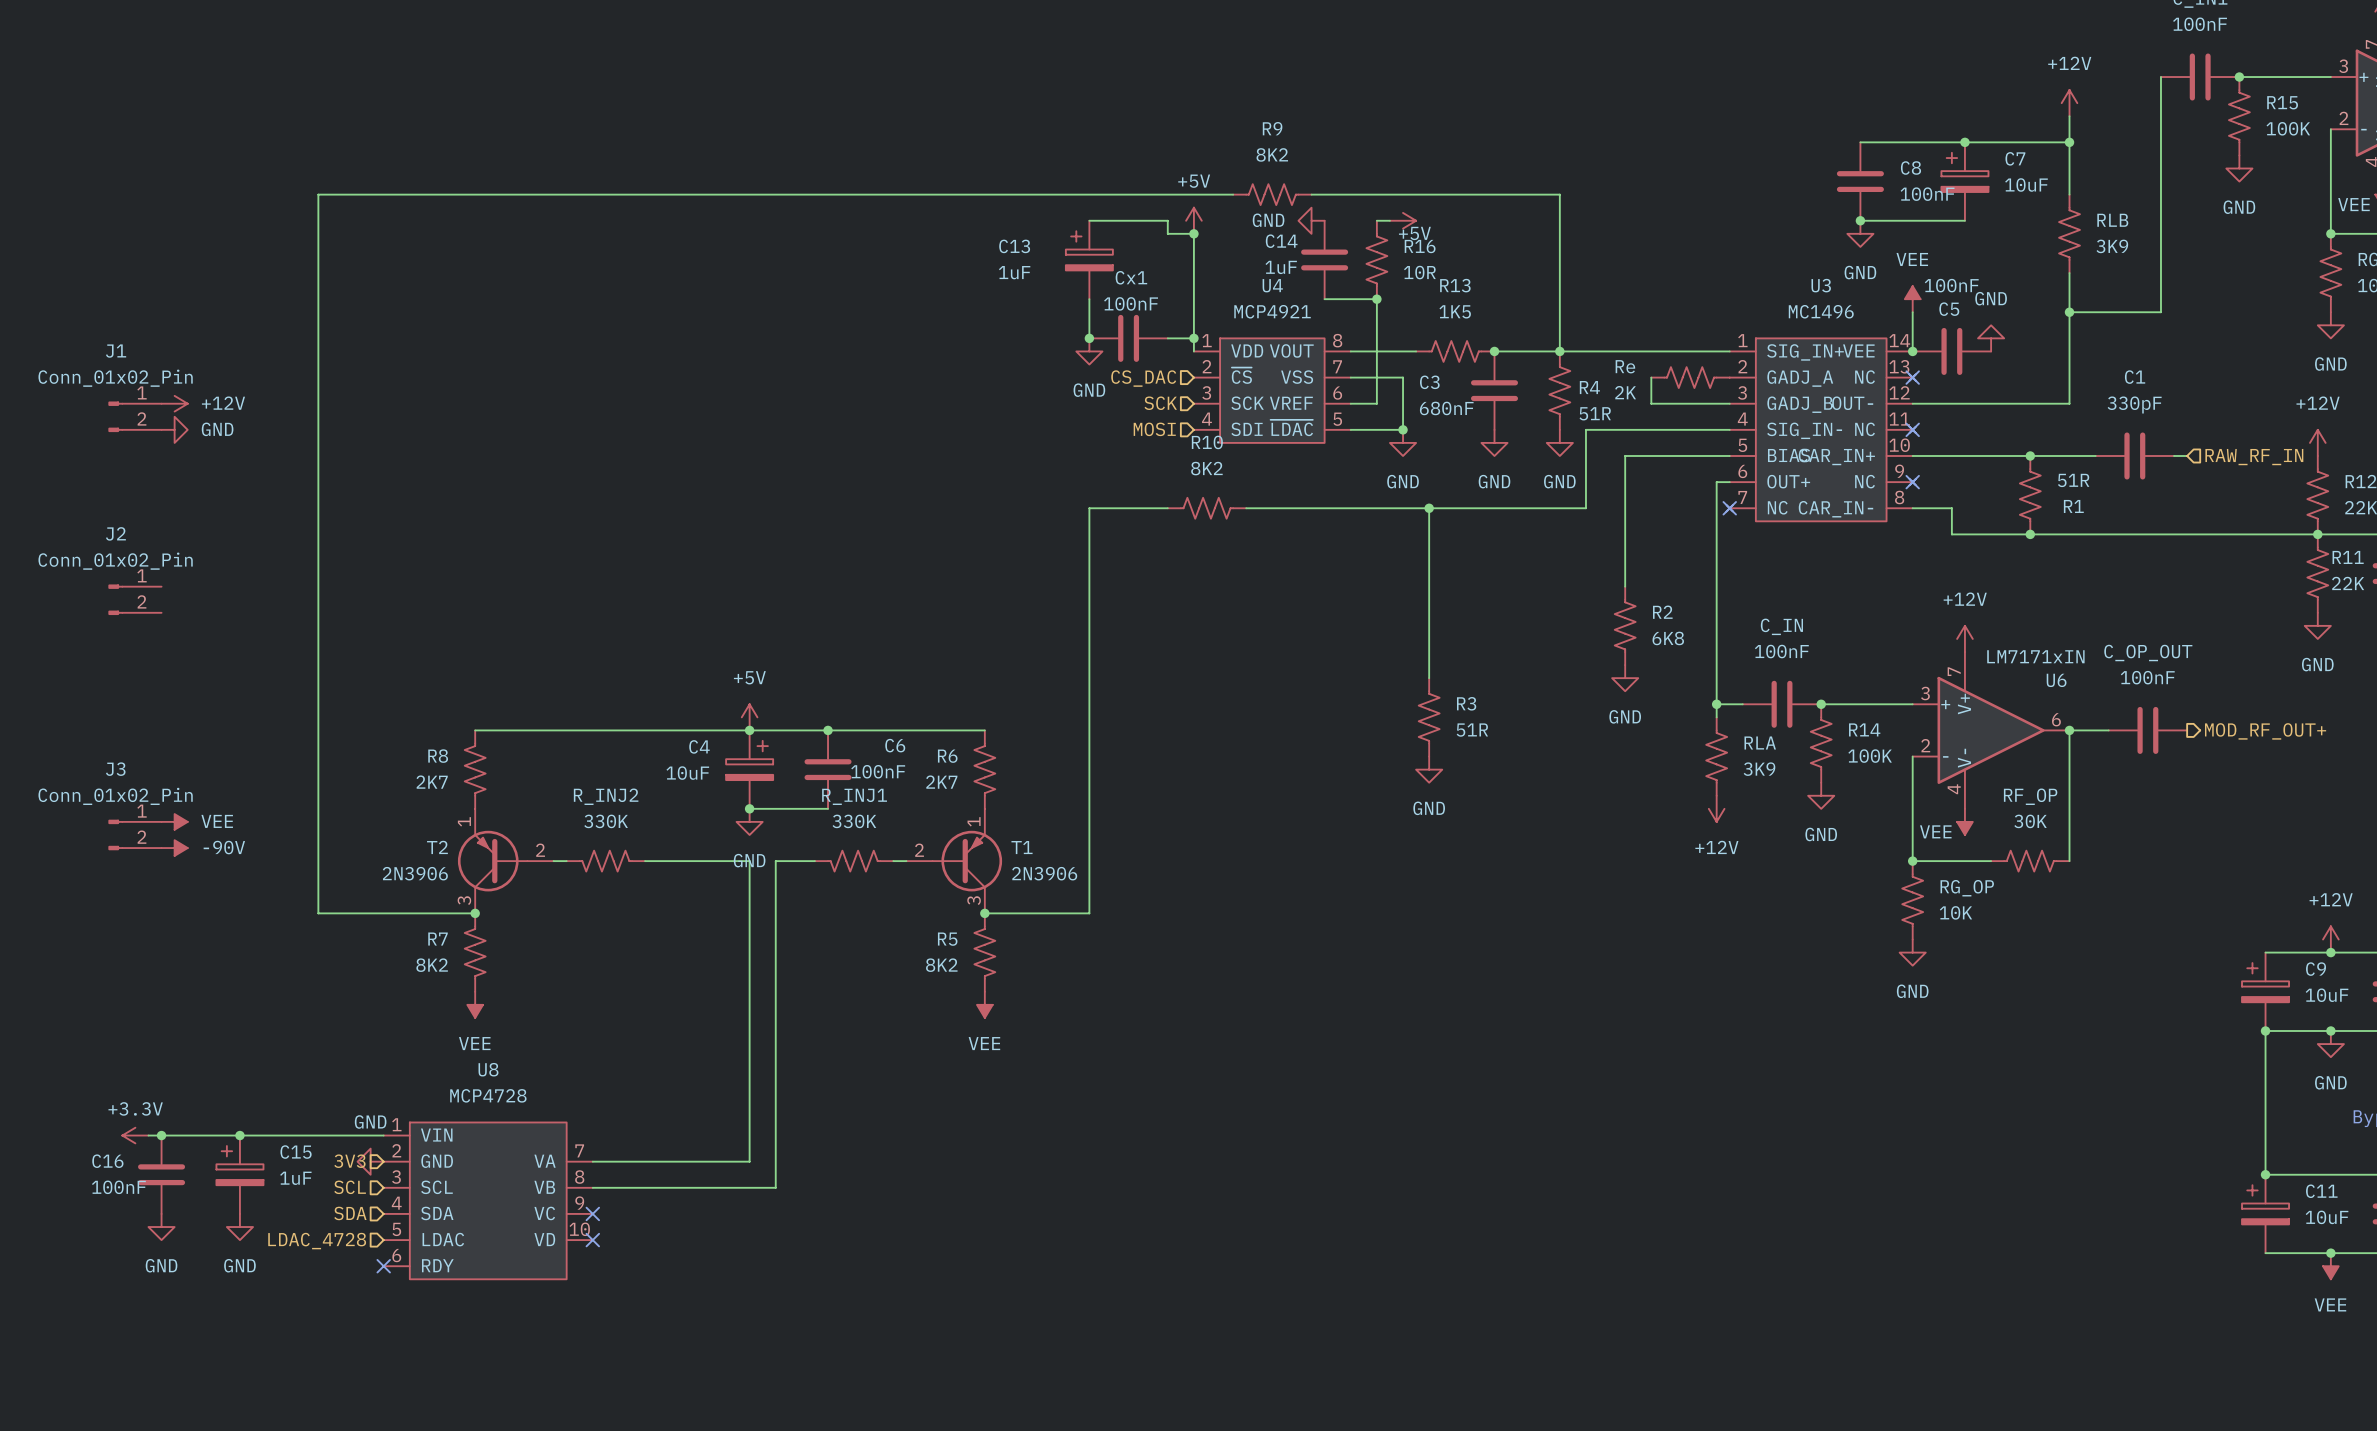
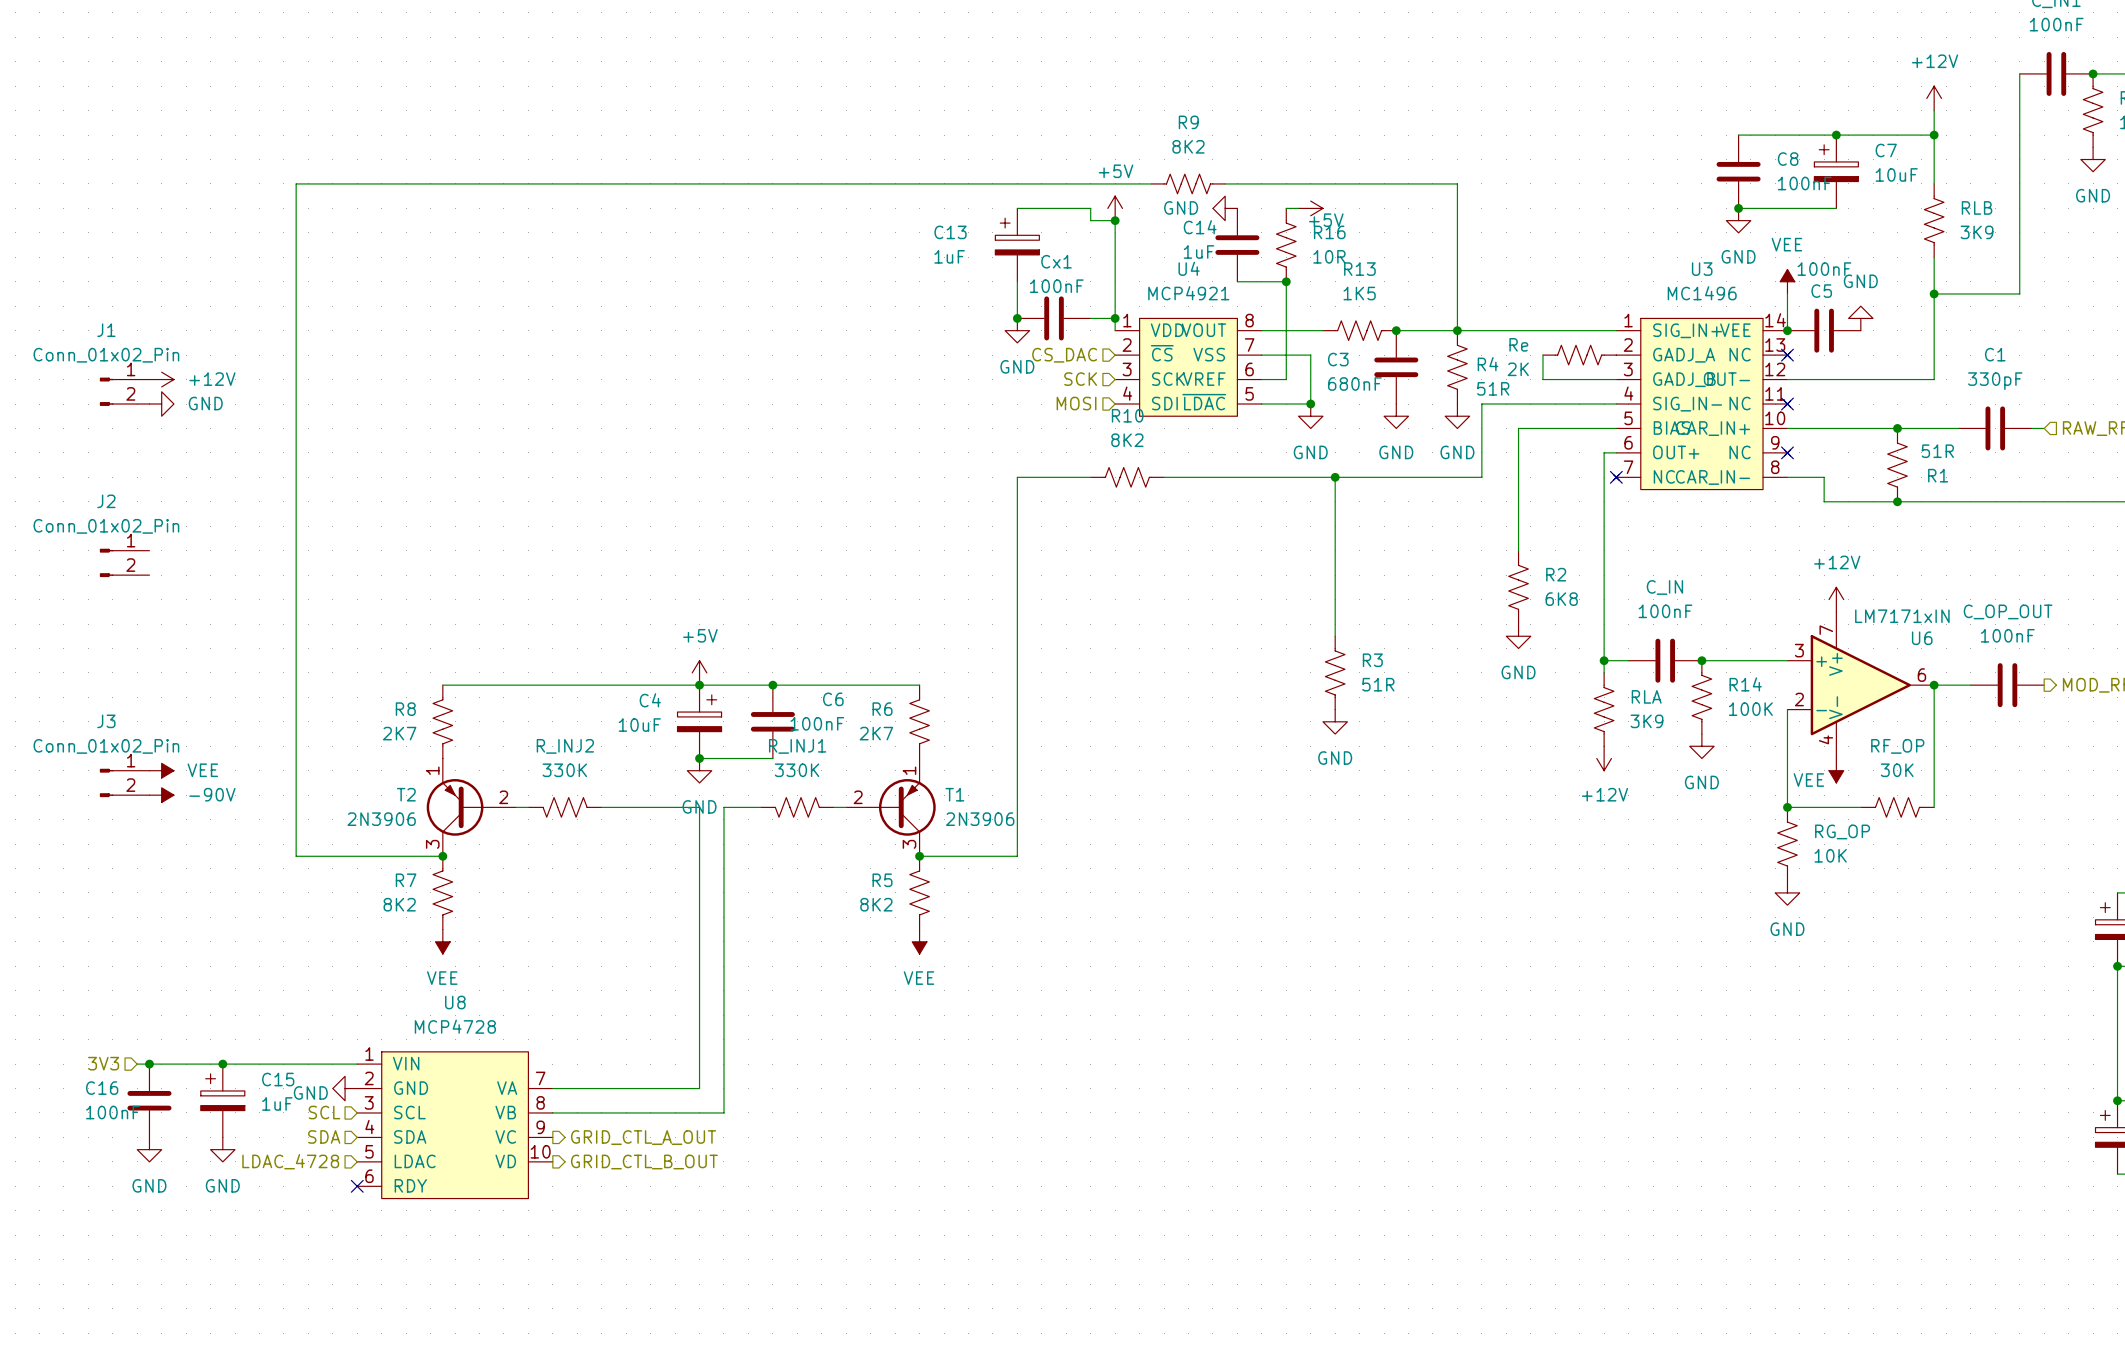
power symbol text position: GND (370, 1121) -> GND (310, 1092)
power symbol: +3.3V (135, 1135) -> none
hierarchical label position: 3V3 (349, 1161) -> 3V3 (103, 1063)
no-connect mark: (592, 1213) -> none
hierarchical label: none -> GRID_CTL_A_OUT (643, 1137)
no-connect mark: (592, 1240) -> none
hierarchical label: none -> GRID_CTL_B_OUT (644, 1162)

